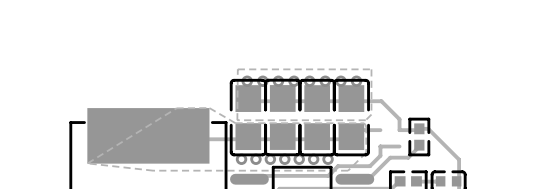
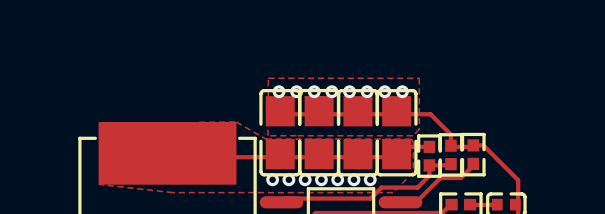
part: none -> (450, 154)
part: none -> (429, 156)

